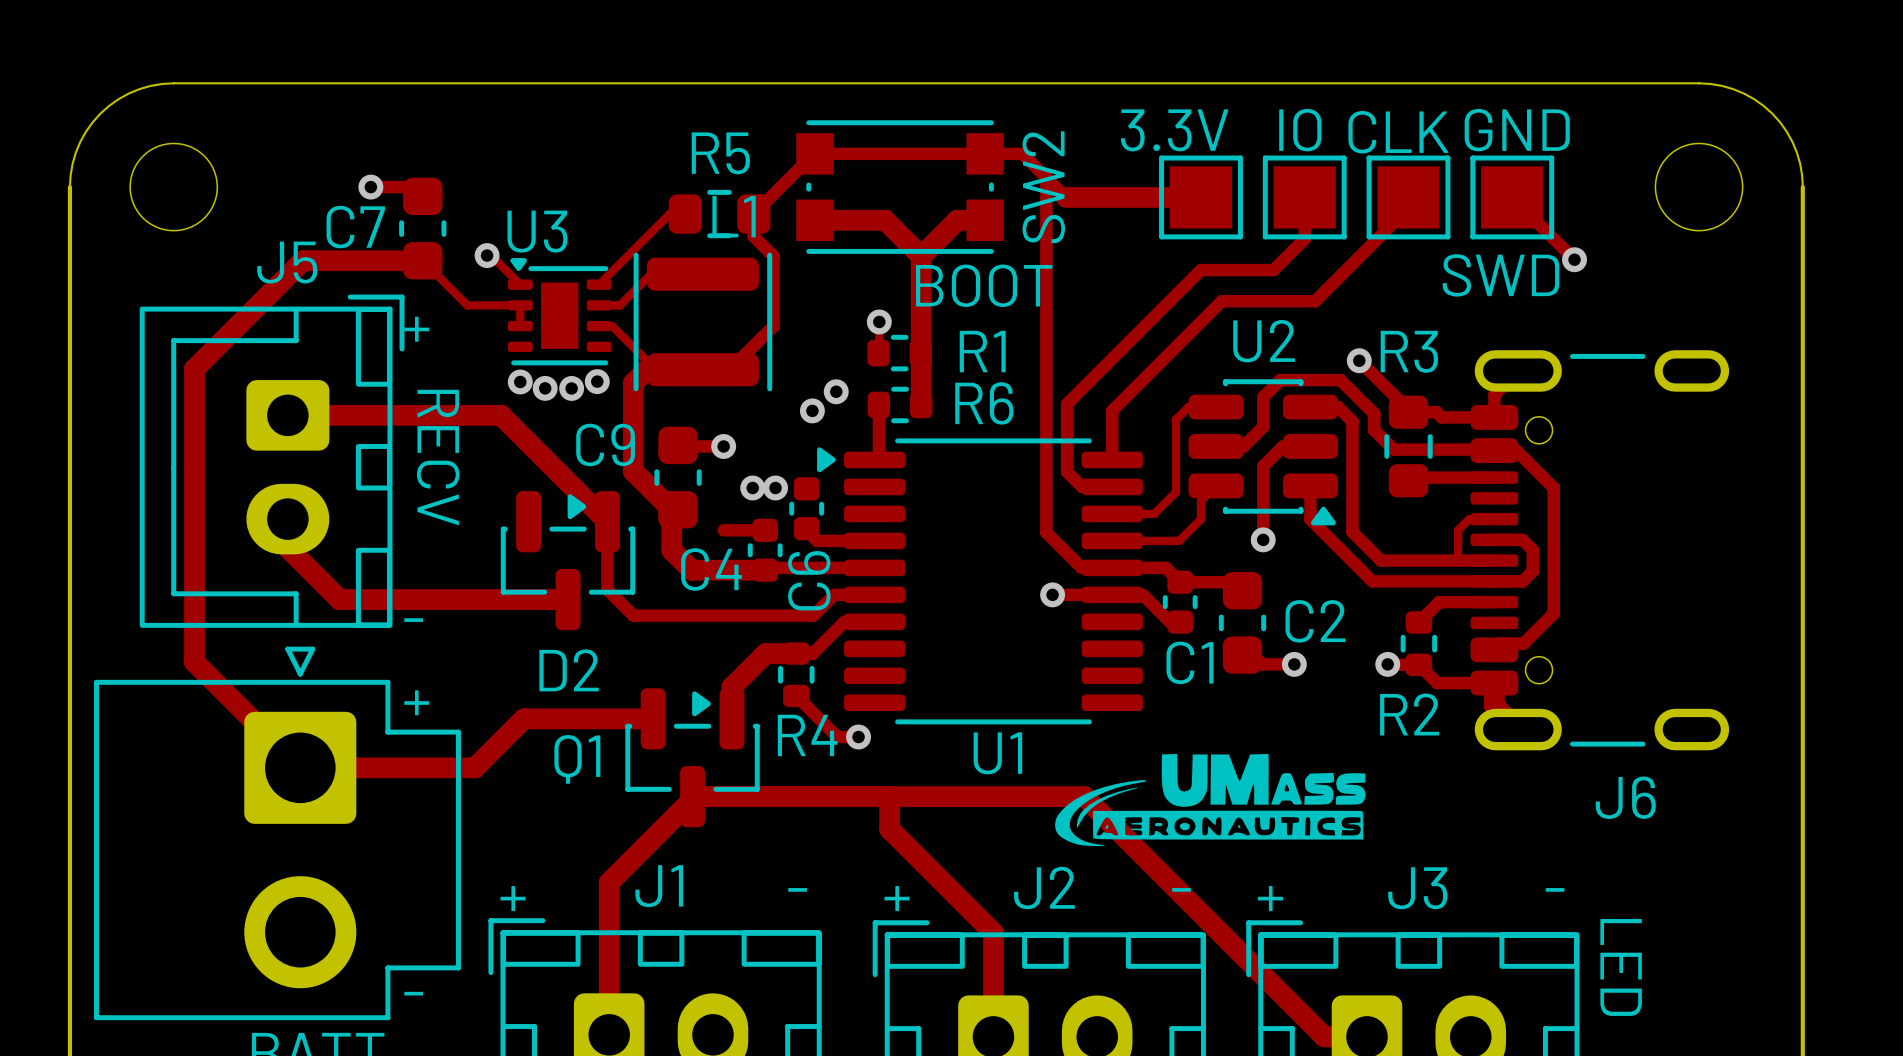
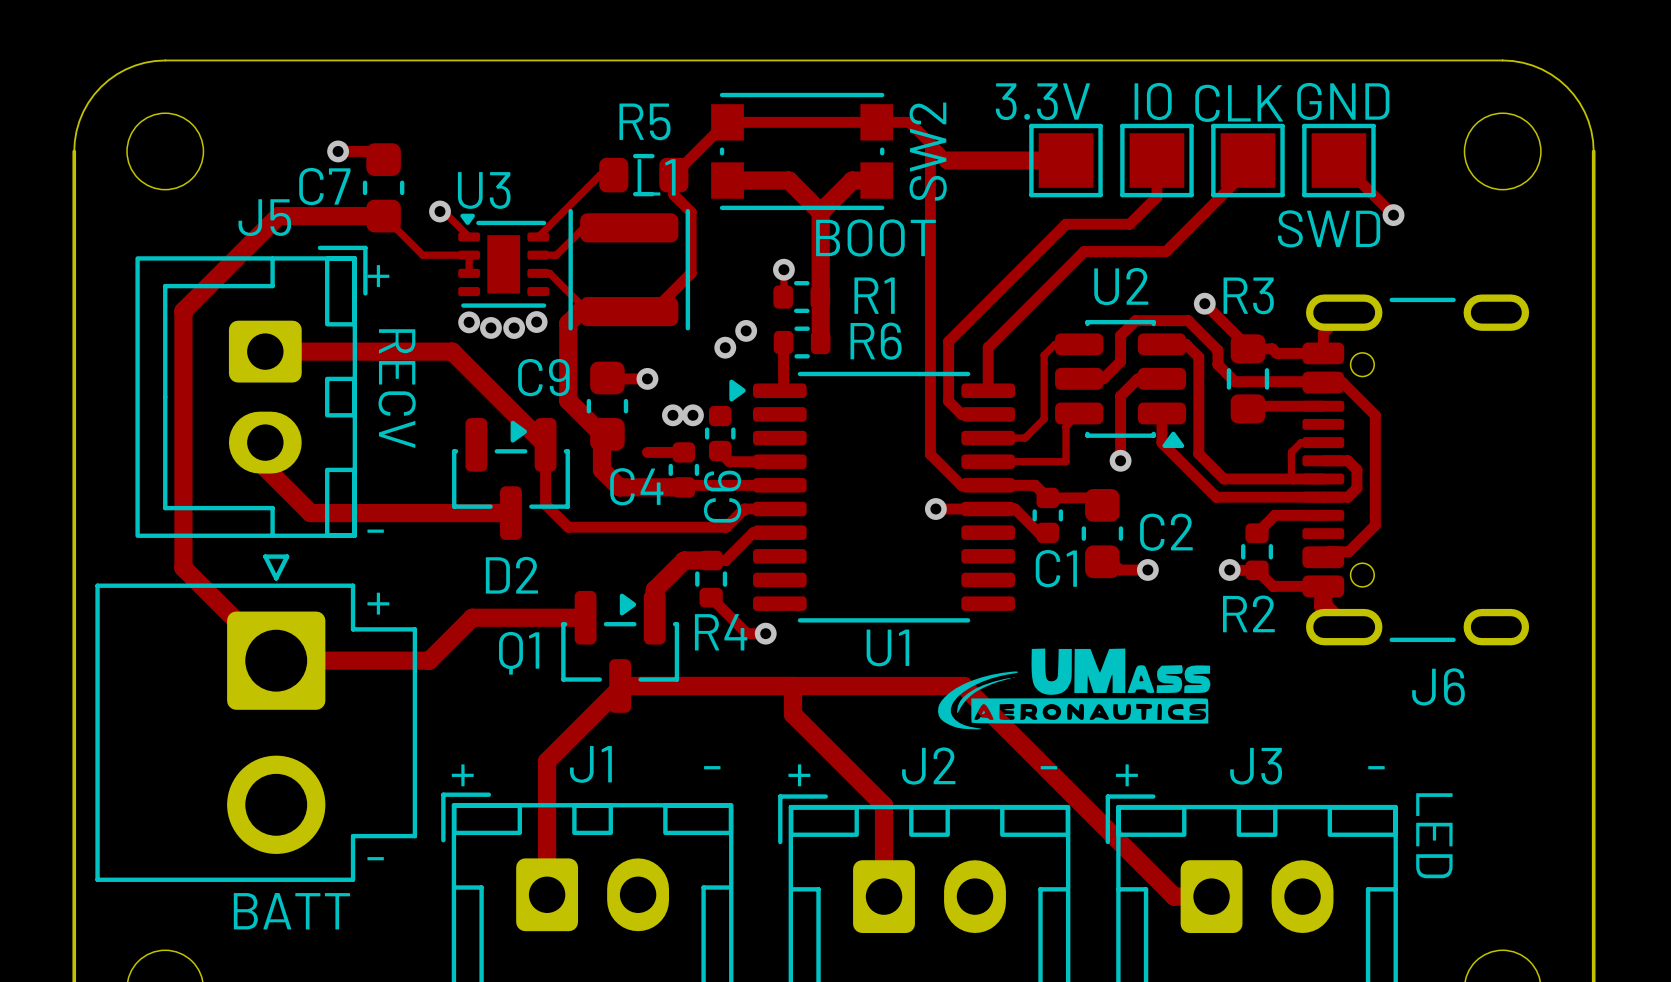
track: (1200, 519) (1179, 540) -> (1065, 442) (1065, 461) (1046, 461)

